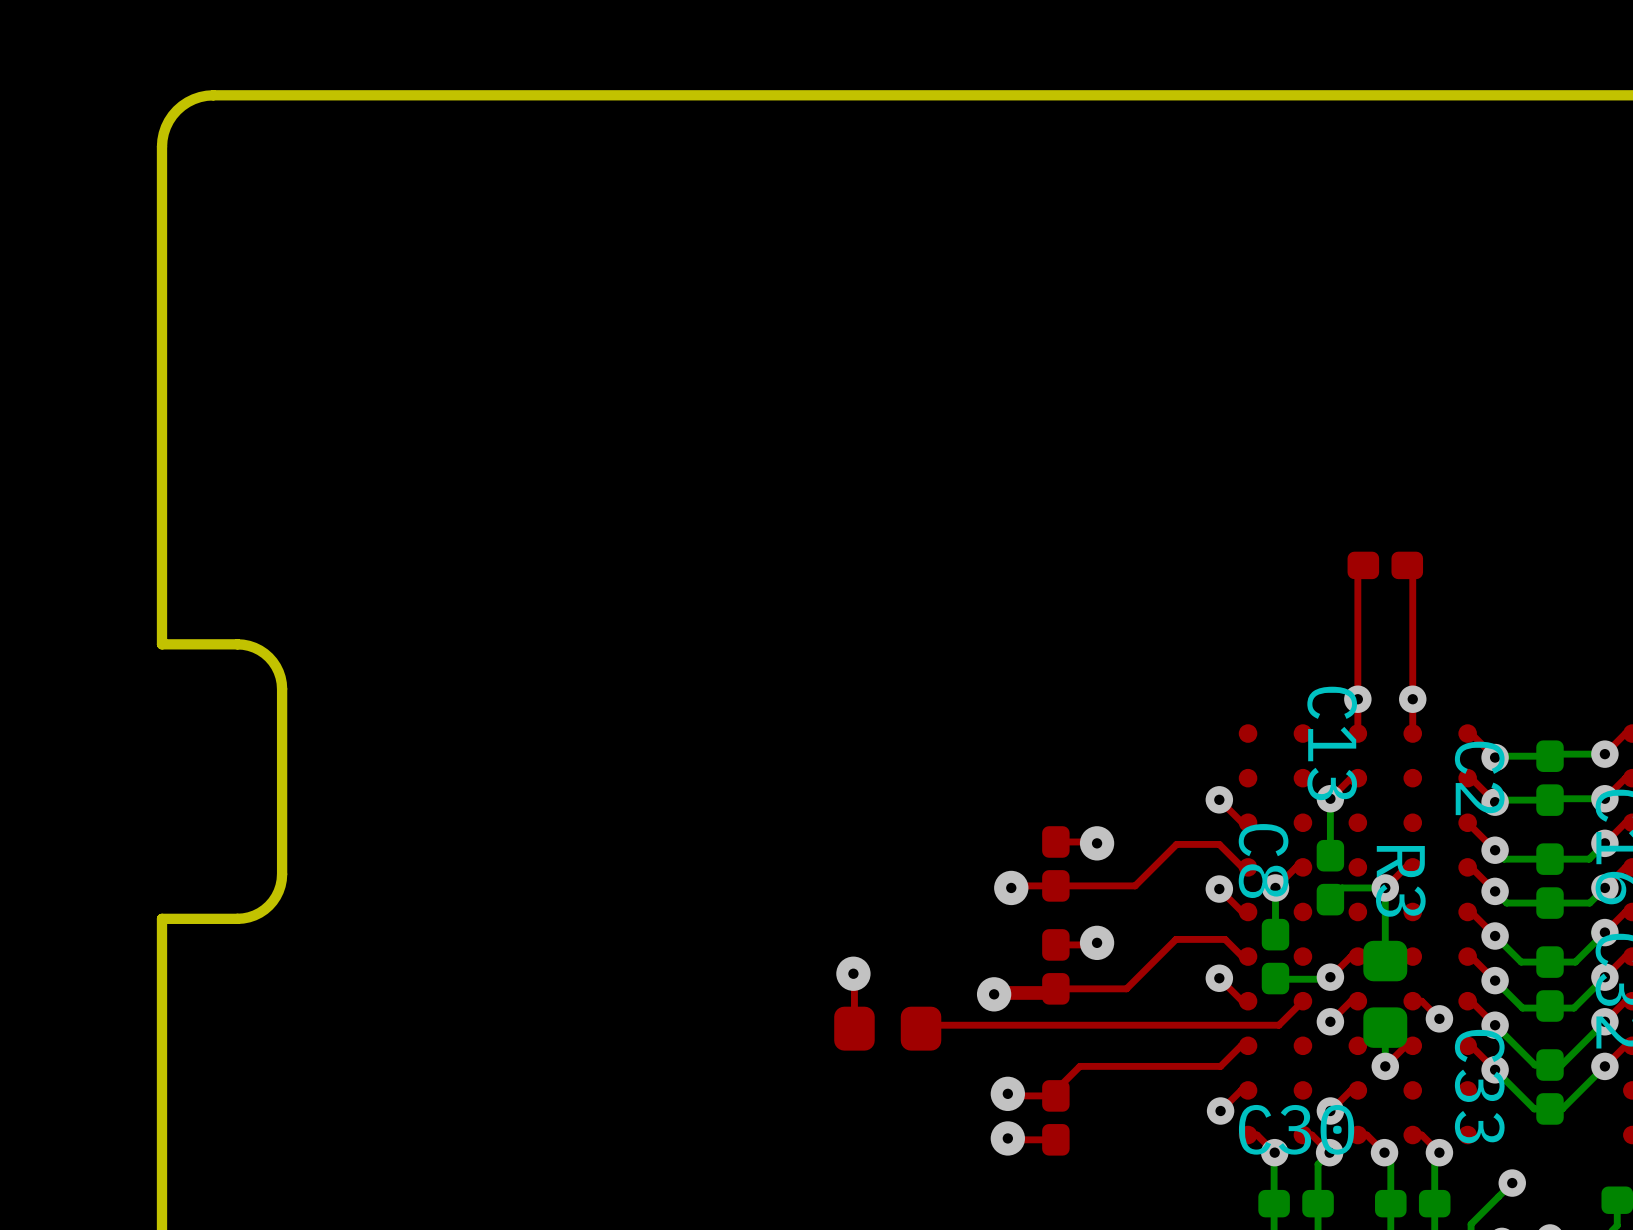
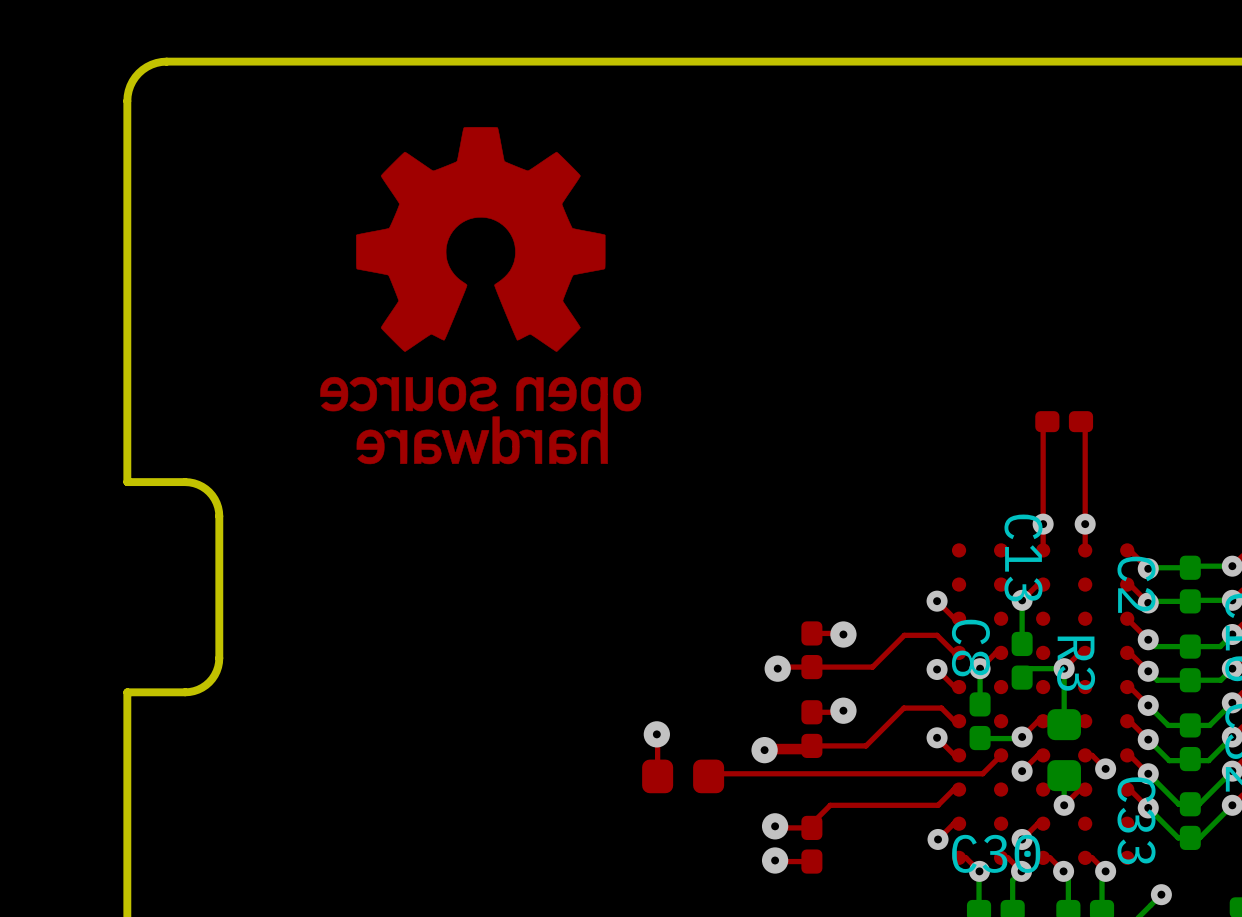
drawing: none -> [320, 127, 642, 465]

